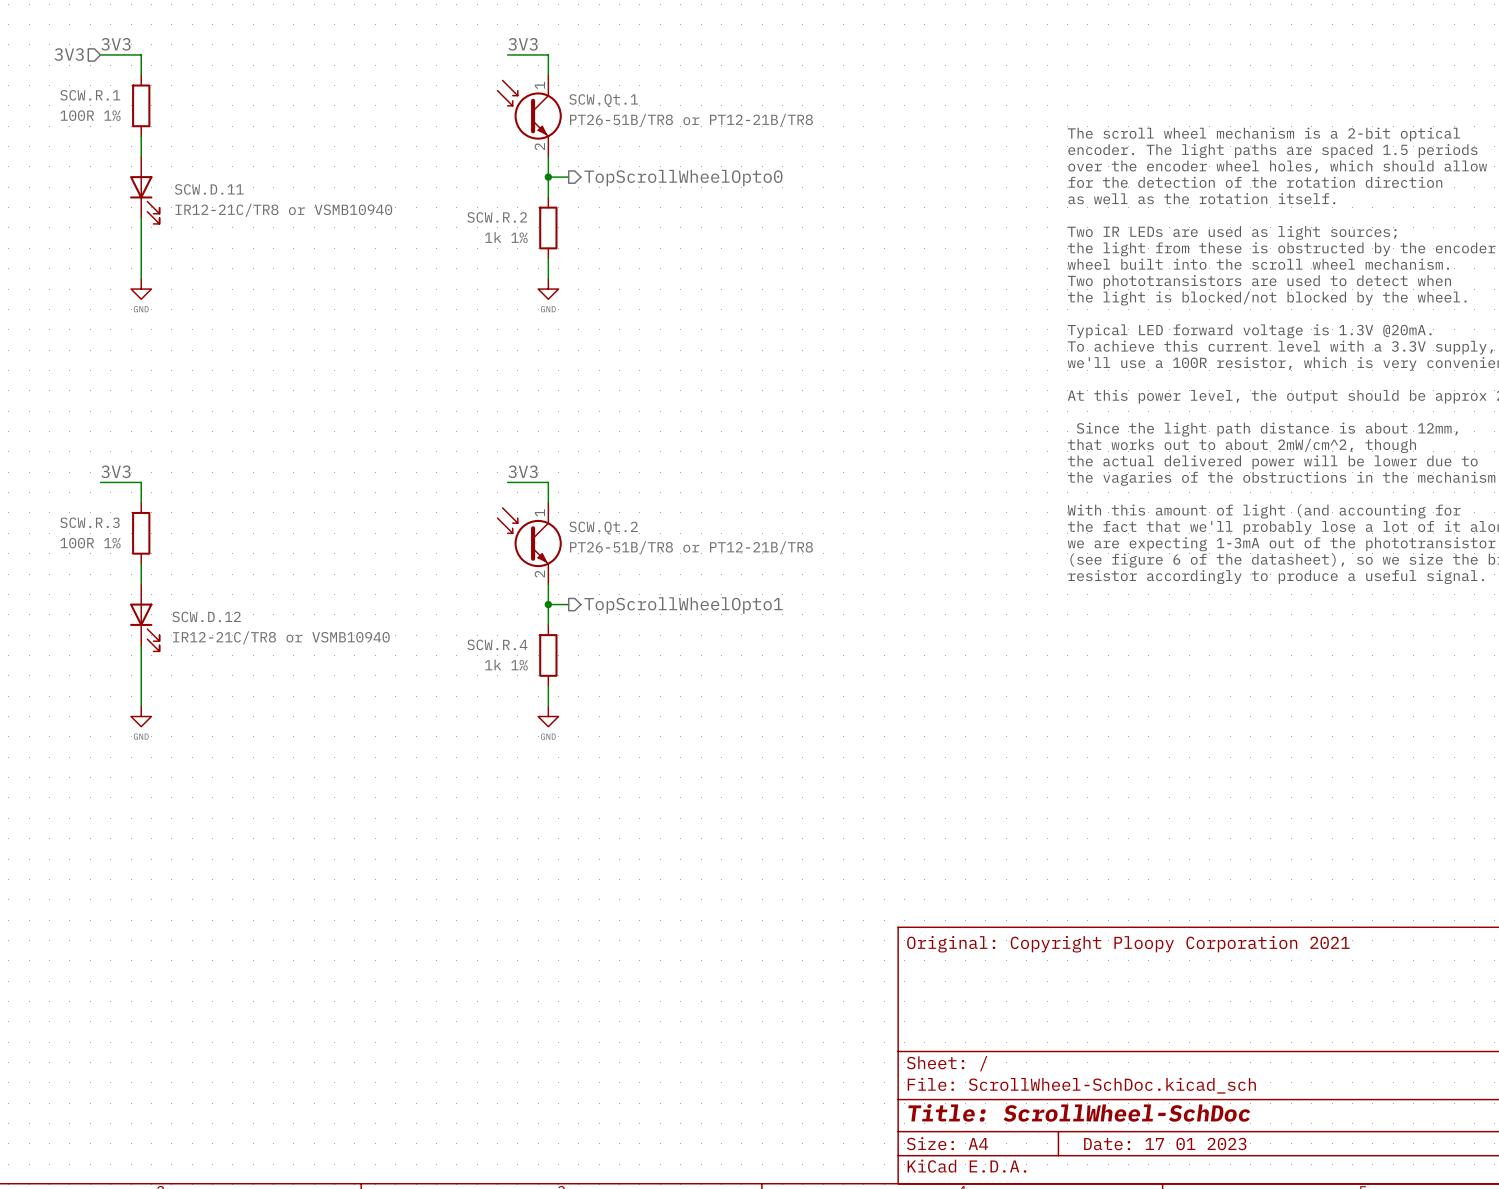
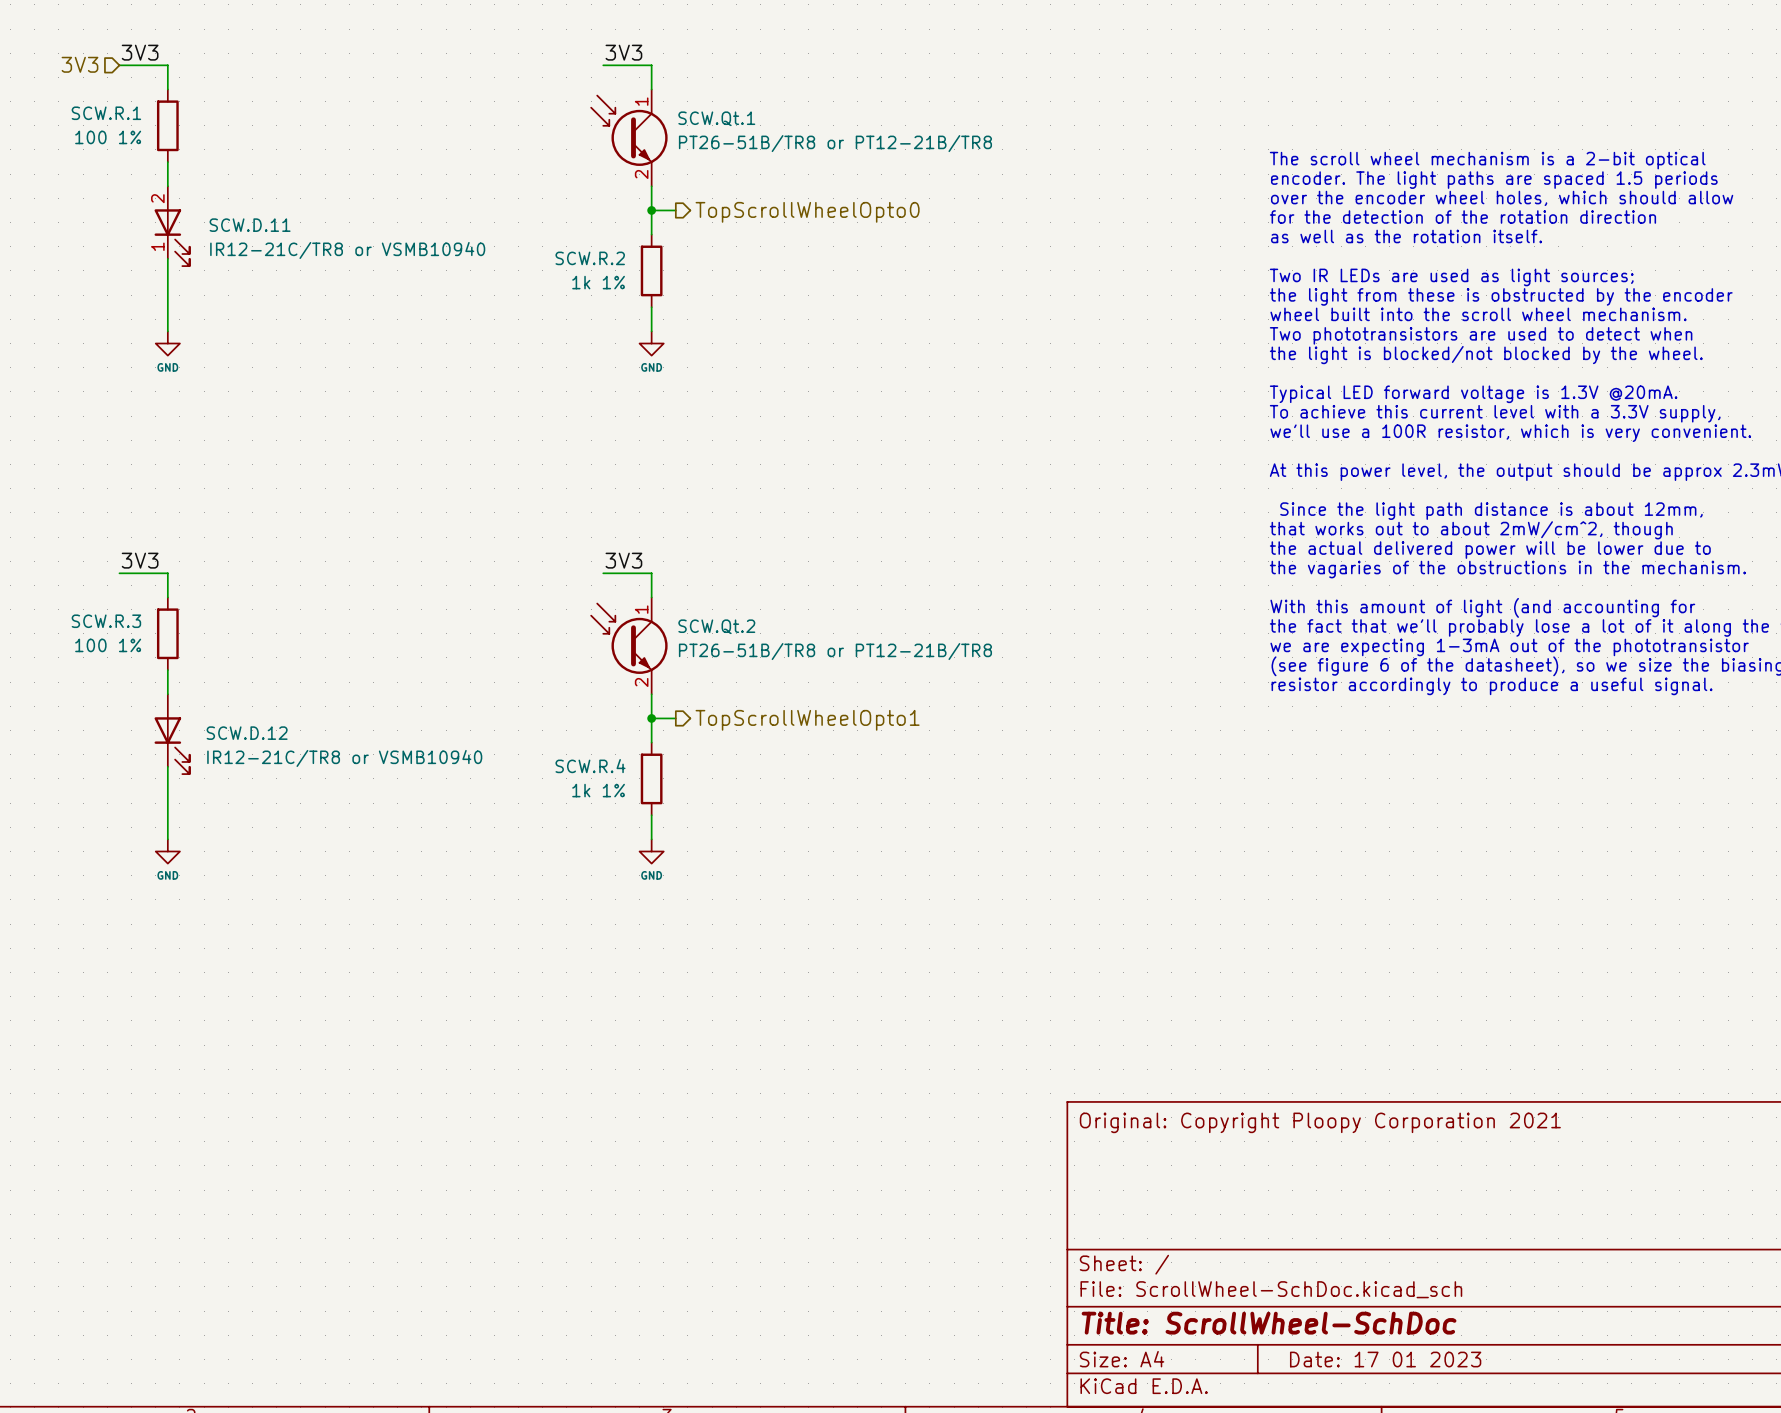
SCW.R.1 value: 100R 1% (90, 115) -> 100 1% (108, 137)
SCW.D.11 pin number: none -> 2 (157, 198)
SCW.D.11 pin number: none -> 1 (157, 246)
SCW.R.3 value: 100R 1% (90, 543) -> 100 1% (108, 645)

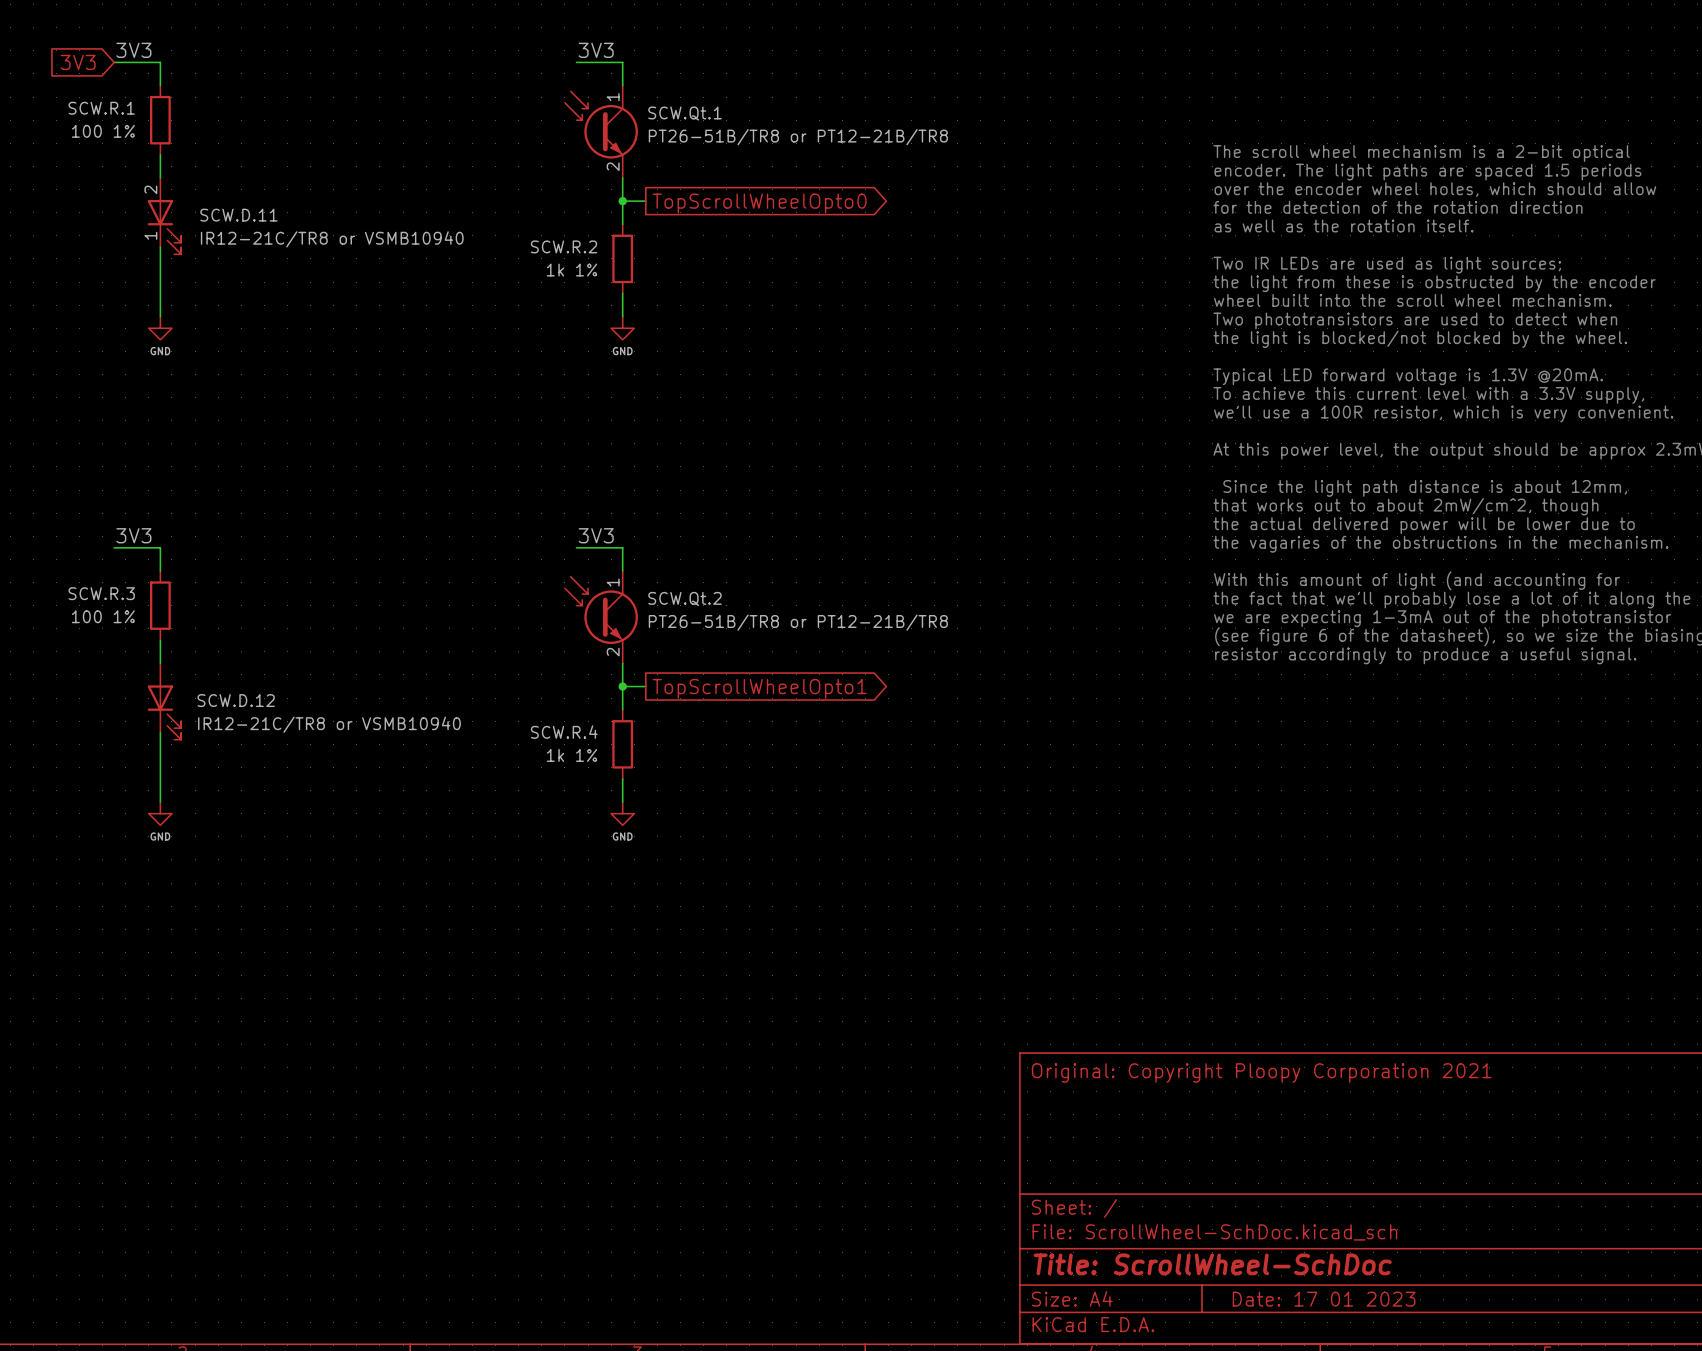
hierarchical label: 3V3 (79, 64) -> none
global label: none -> 3V3 (78, 62)
global label: none -> TopScrollWheelOpto0 (759, 203)
hierarchical label: TopScrollWheelOpto0 (807, 212) -> none
global label: none -> TopScrollWheelOpto1 (759, 688)
hierarchical label: TopScrollWheelOpto1 (807, 720) -> none

